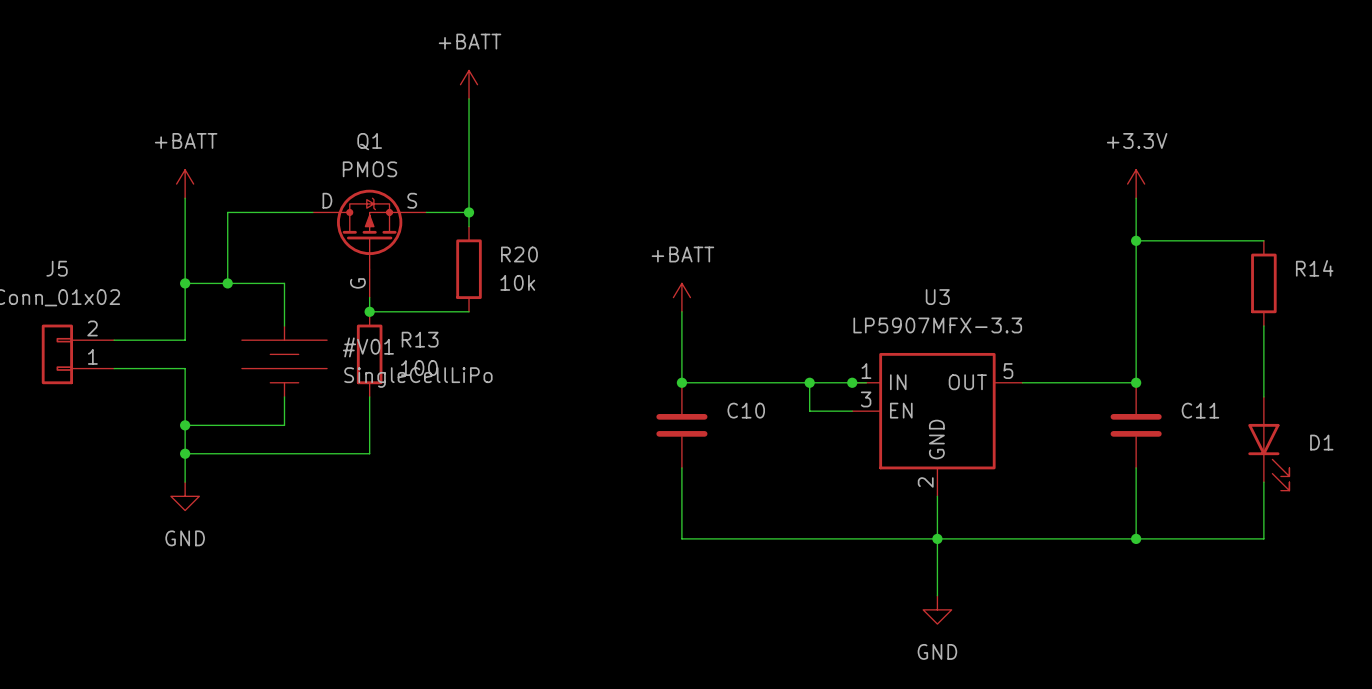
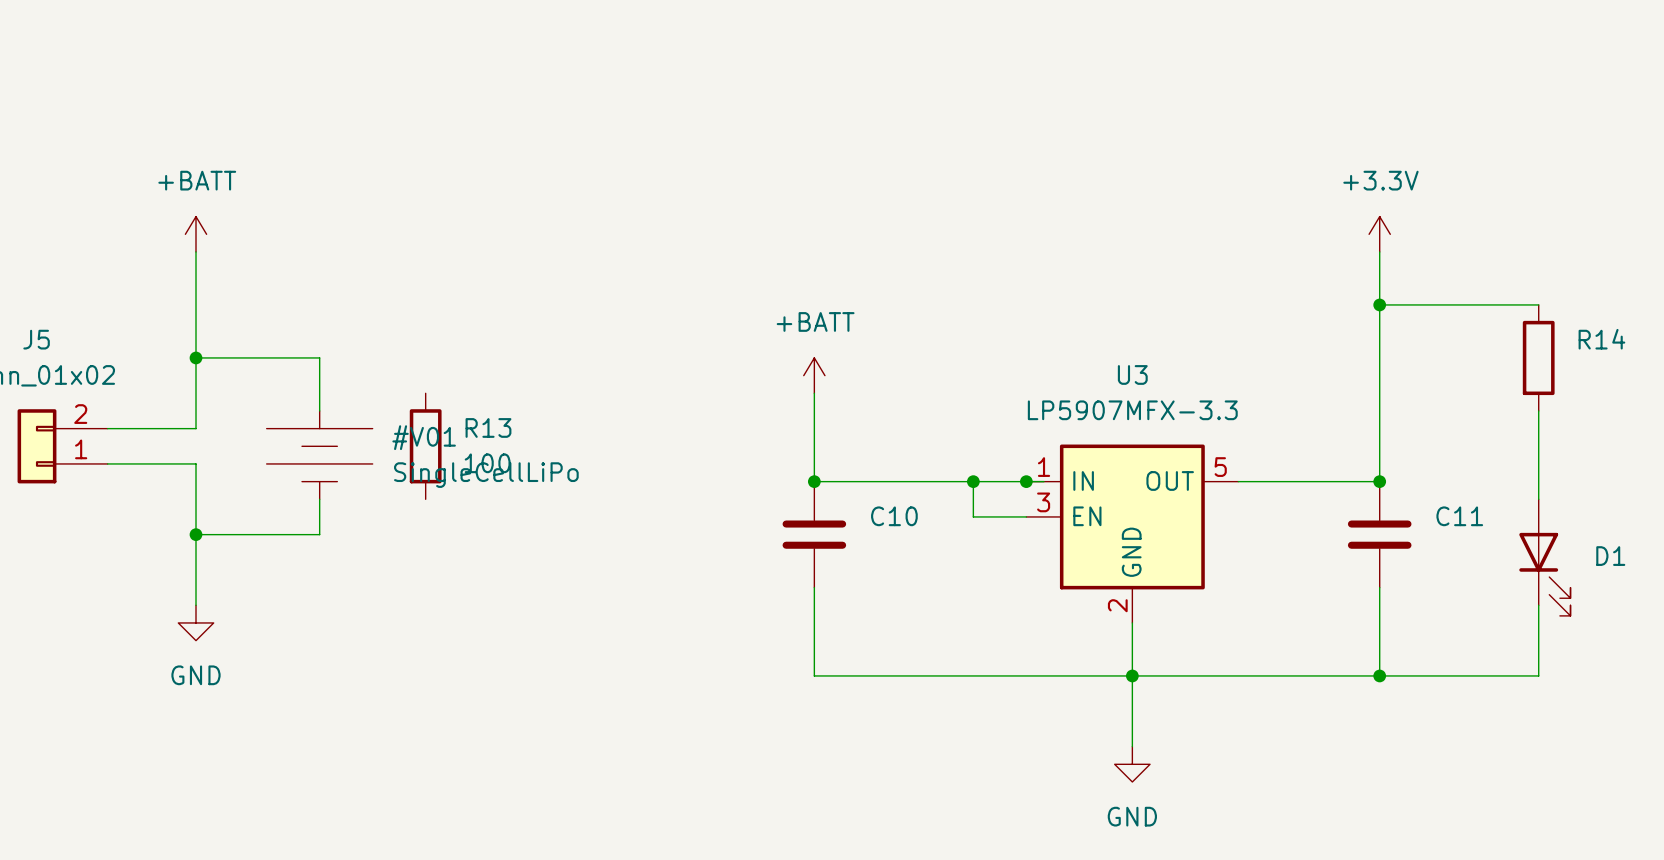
power symbol: +BATT (469, 84) -> none
wire: (469, 98) (469, 226) -> none
wire: (312, 212) (227, 212) (227, 283) -> none
wire: (426, 212) (469, 212) -> none
junction: (469, 212) -> none
Q1: PMOS (369, 243) -> none
R20: 10k (469, 269) -> none
junction: (227, 283) -> none
wire: (369, 297) (369, 311) (469, 311) -> none
junction: (369, 311) -> none
wire: (369, 396) (369, 453) (185, 453) -> none
junction: (185, 453) -> none

